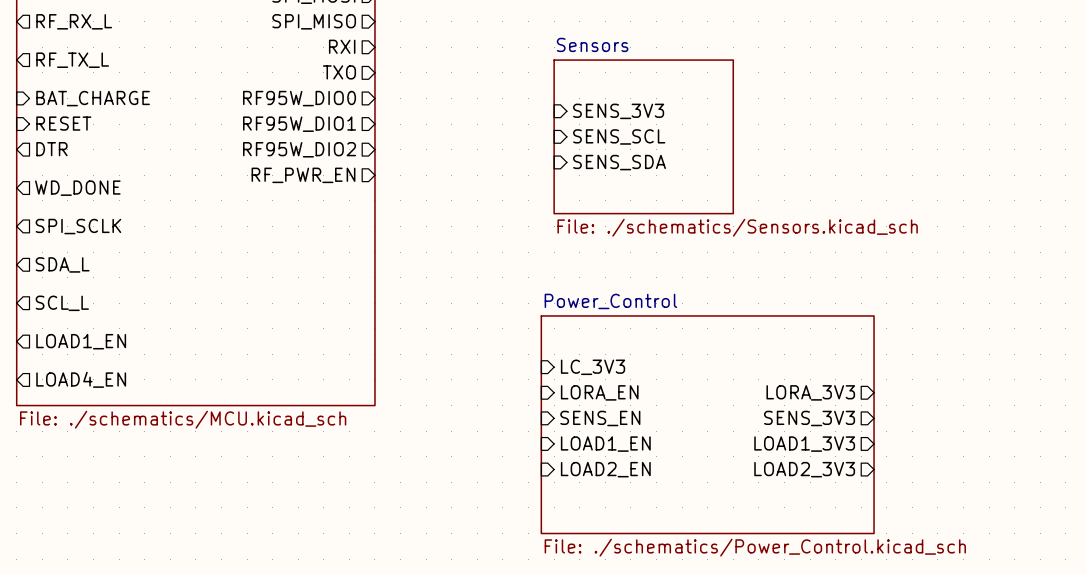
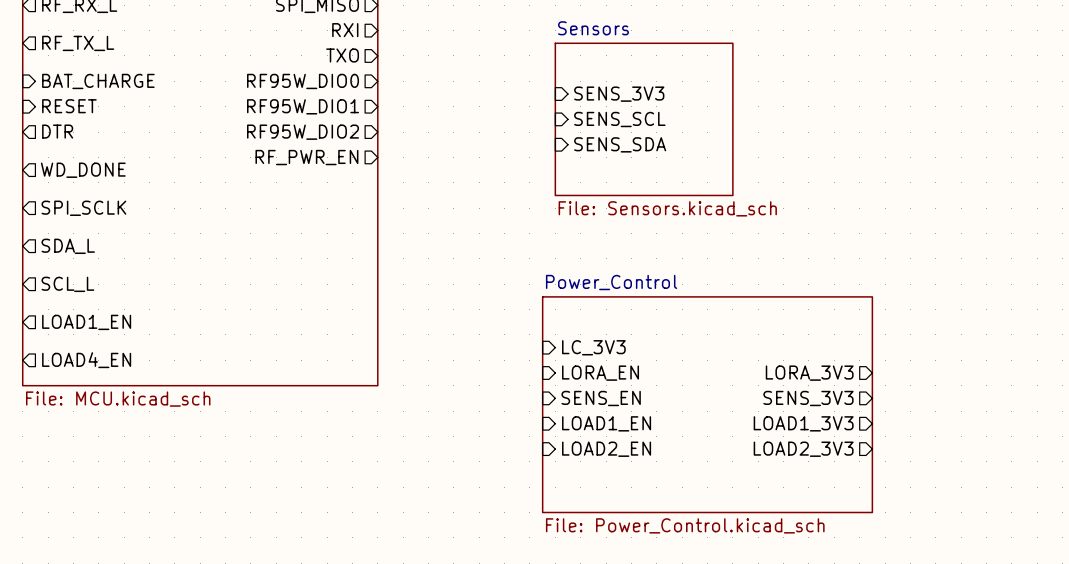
sheet Sensors value: File: ./schematics/Sensors.kicad_sch (737, 227) -> File: Sensors.kicad_sch (667, 208)
sheet value: File: ./schematics/MCU.kicad_sch (183, 419) -> File: MCU.kicad_sch (118, 399)
sheet Power_Control value: File: ./schematics/Power_Control.kicad_sch (755, 547) -> File: Power_Control.kicad_sch (685, 525)

